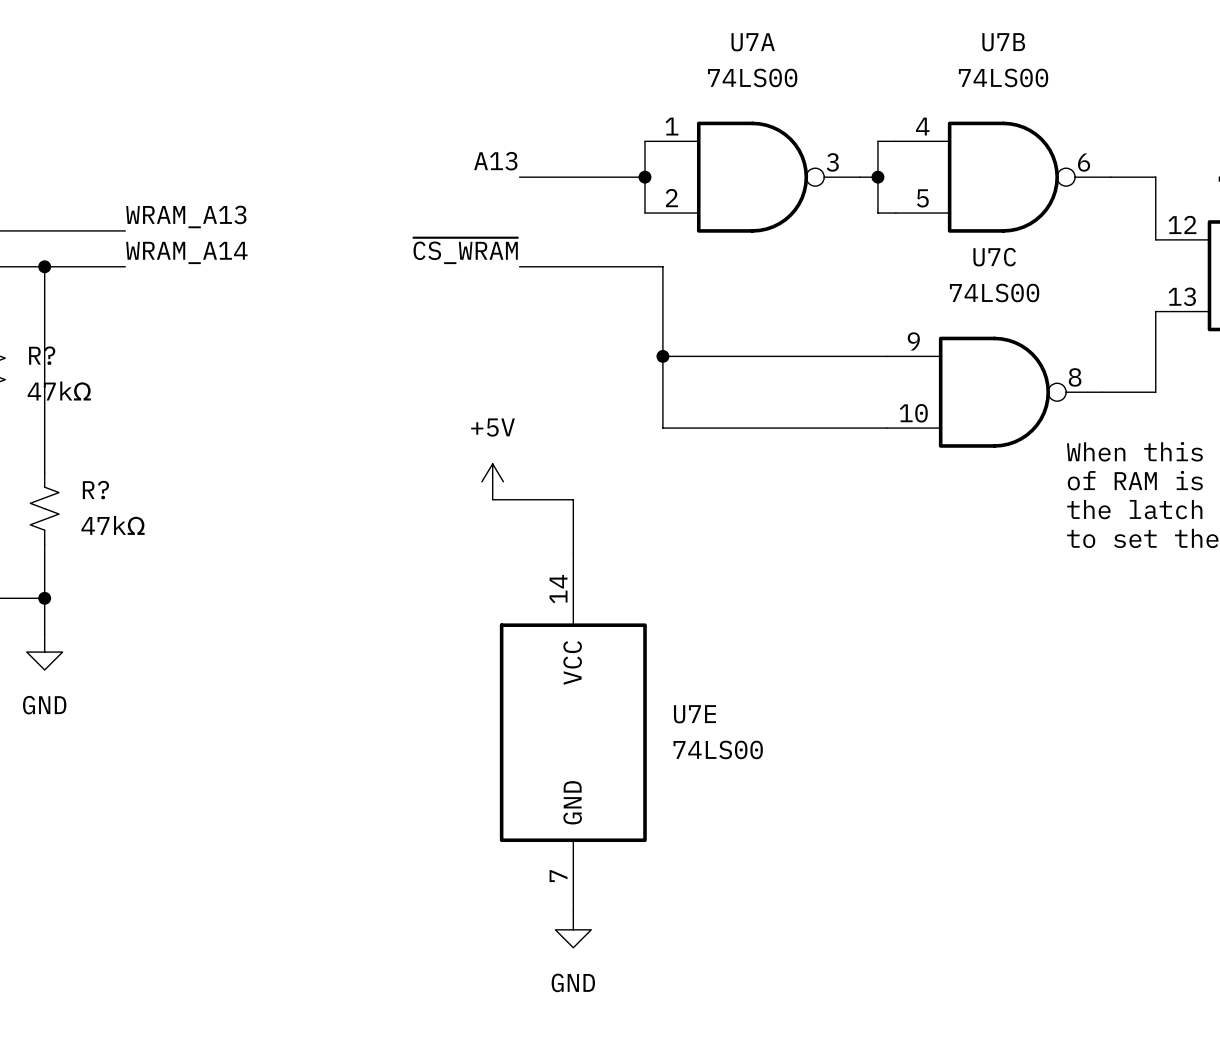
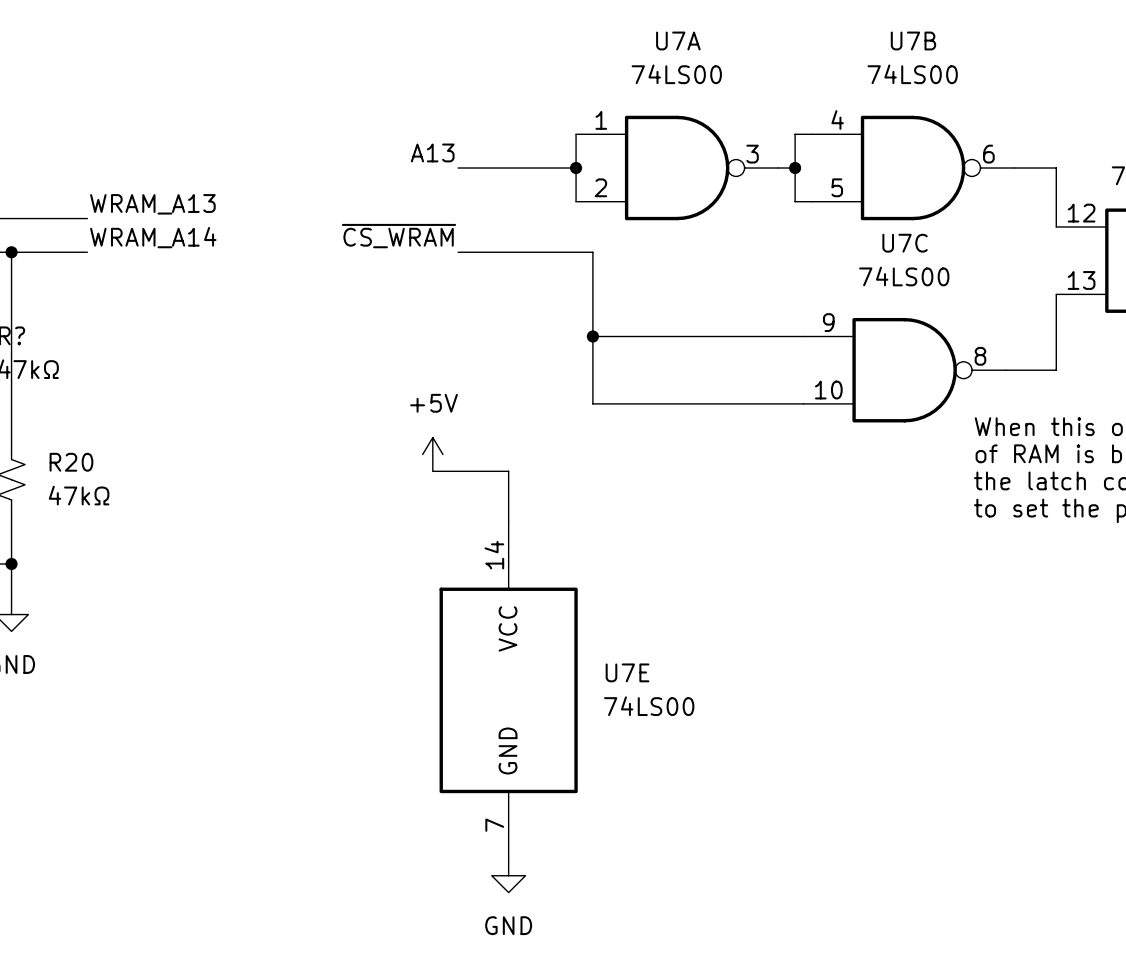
R? name: R? (95, 490) -> R20 (71, 462)

